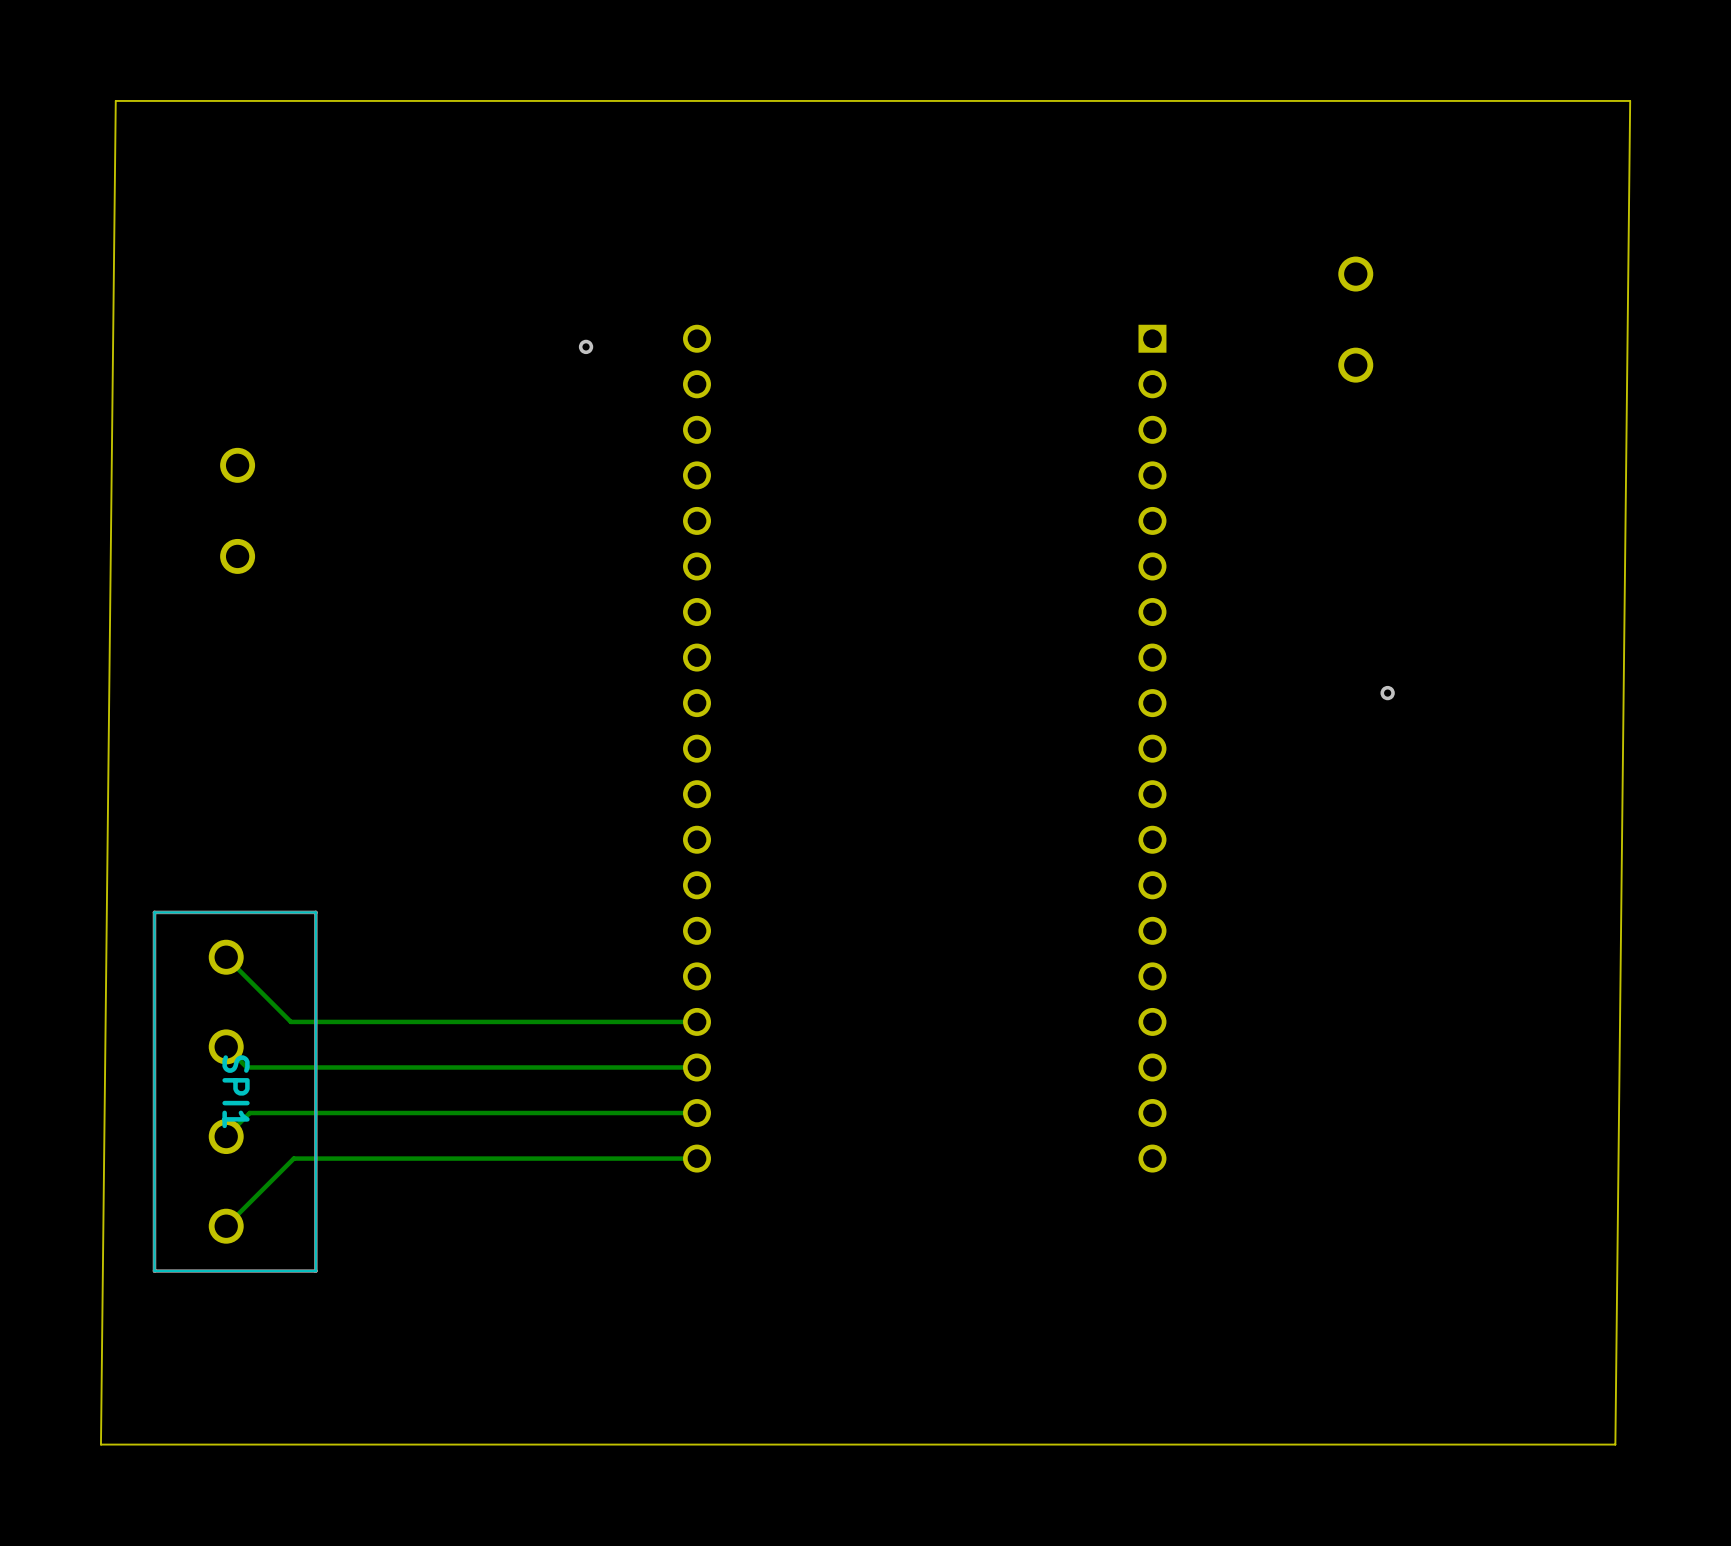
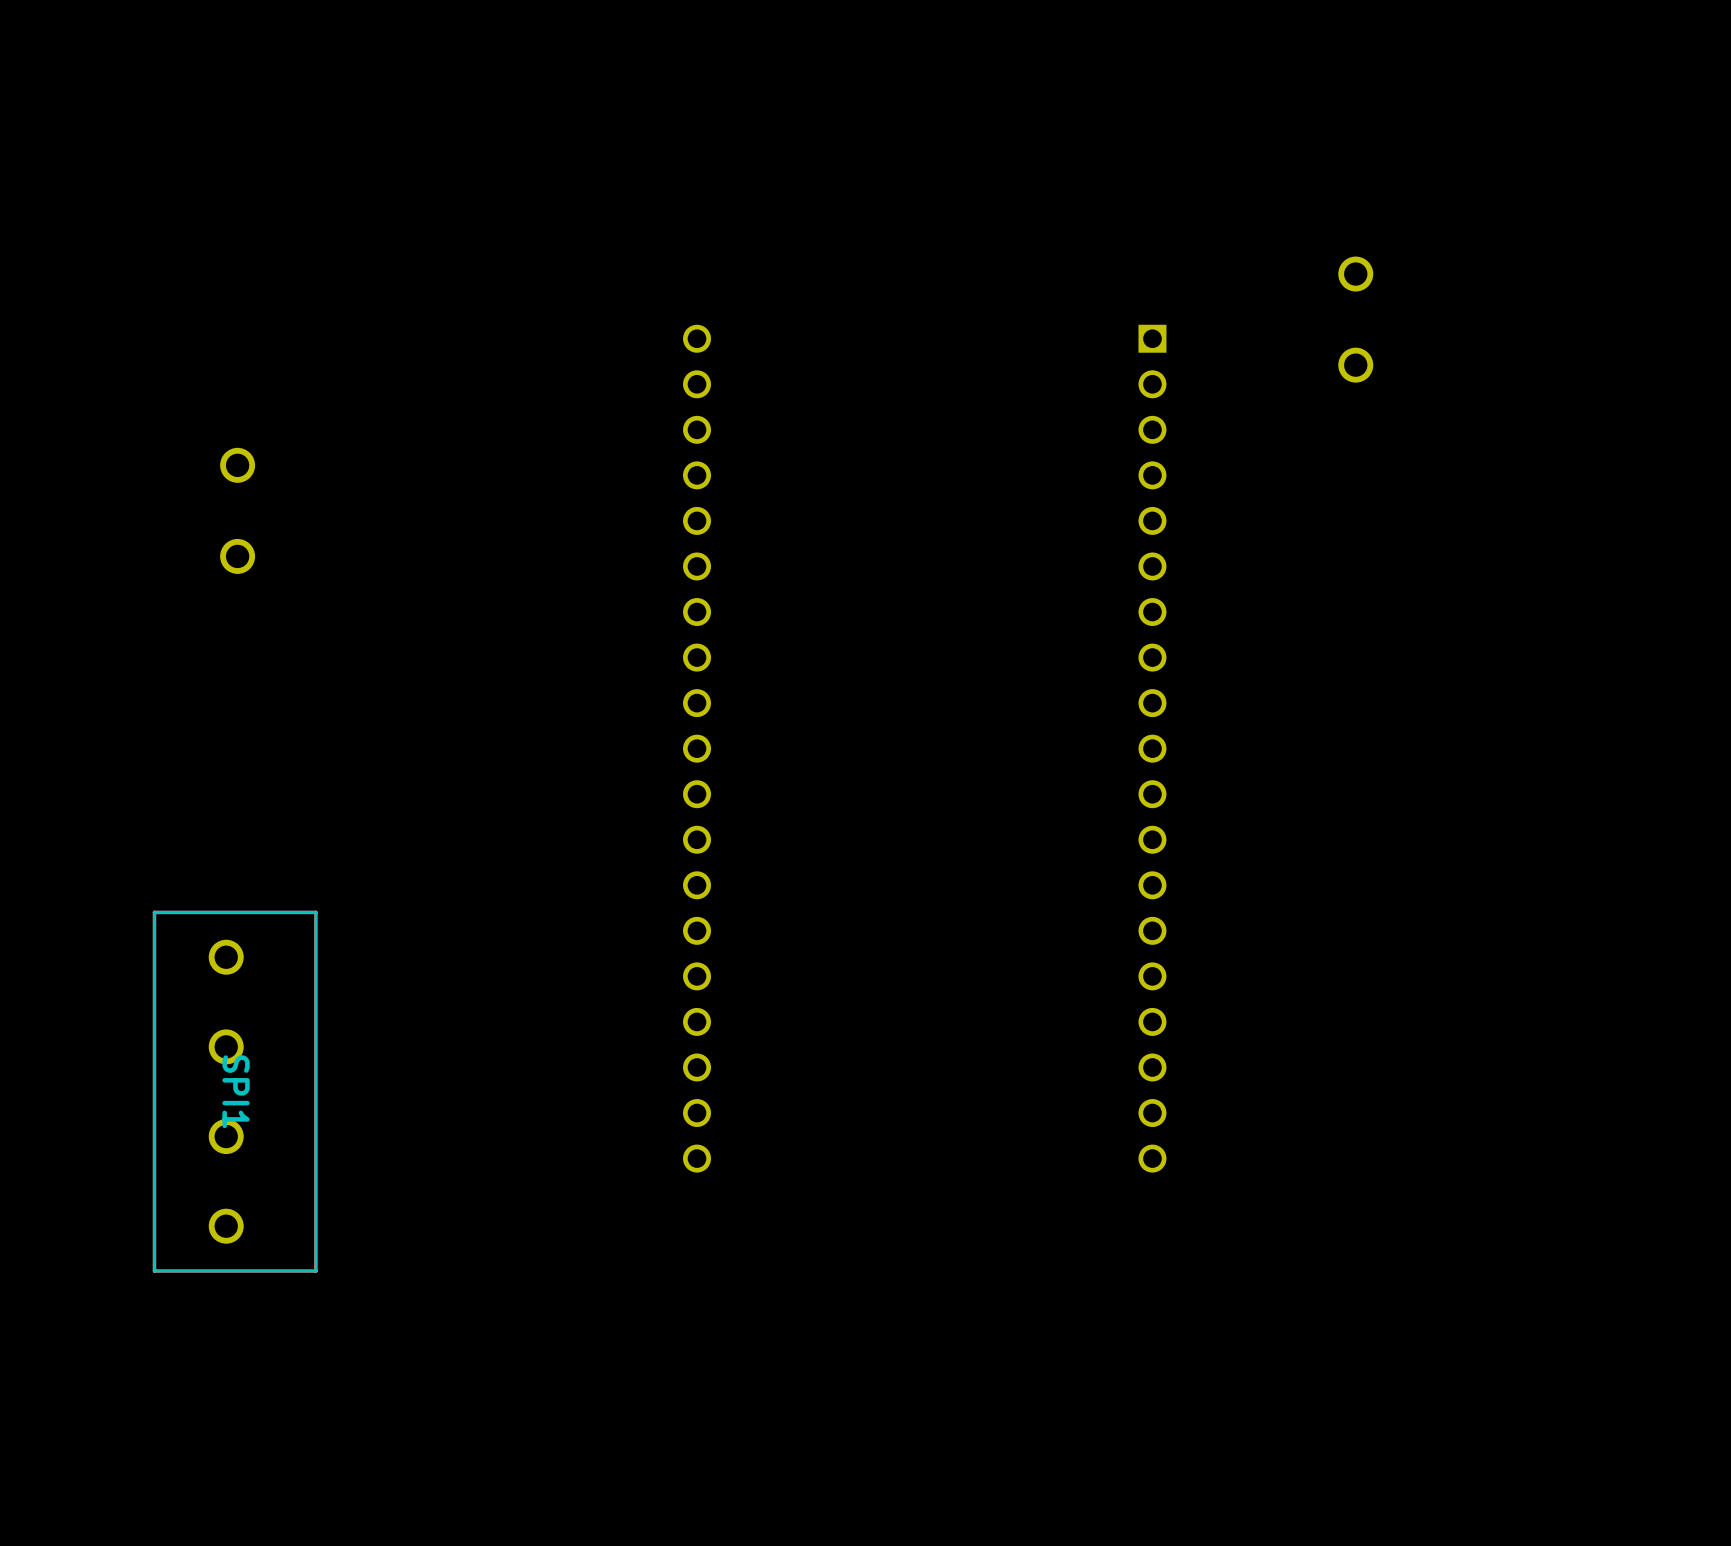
board edge: (1630, 100) (1615, 1444) (100, 1444) (115, 100) (1630, 100) -> none
via: (586, 346) -> none
via: (1387, 693) -> none
track: (226, 957) (290, 1021) (697, 1021) -> none
track: (226, 1046) (246, 1067) (697, 1067) -> none
track: (697, 1113) (249, 1113) (226, 1136) -> none
track: (697, 1158) (293, 1158) (226, 1226) -> none

